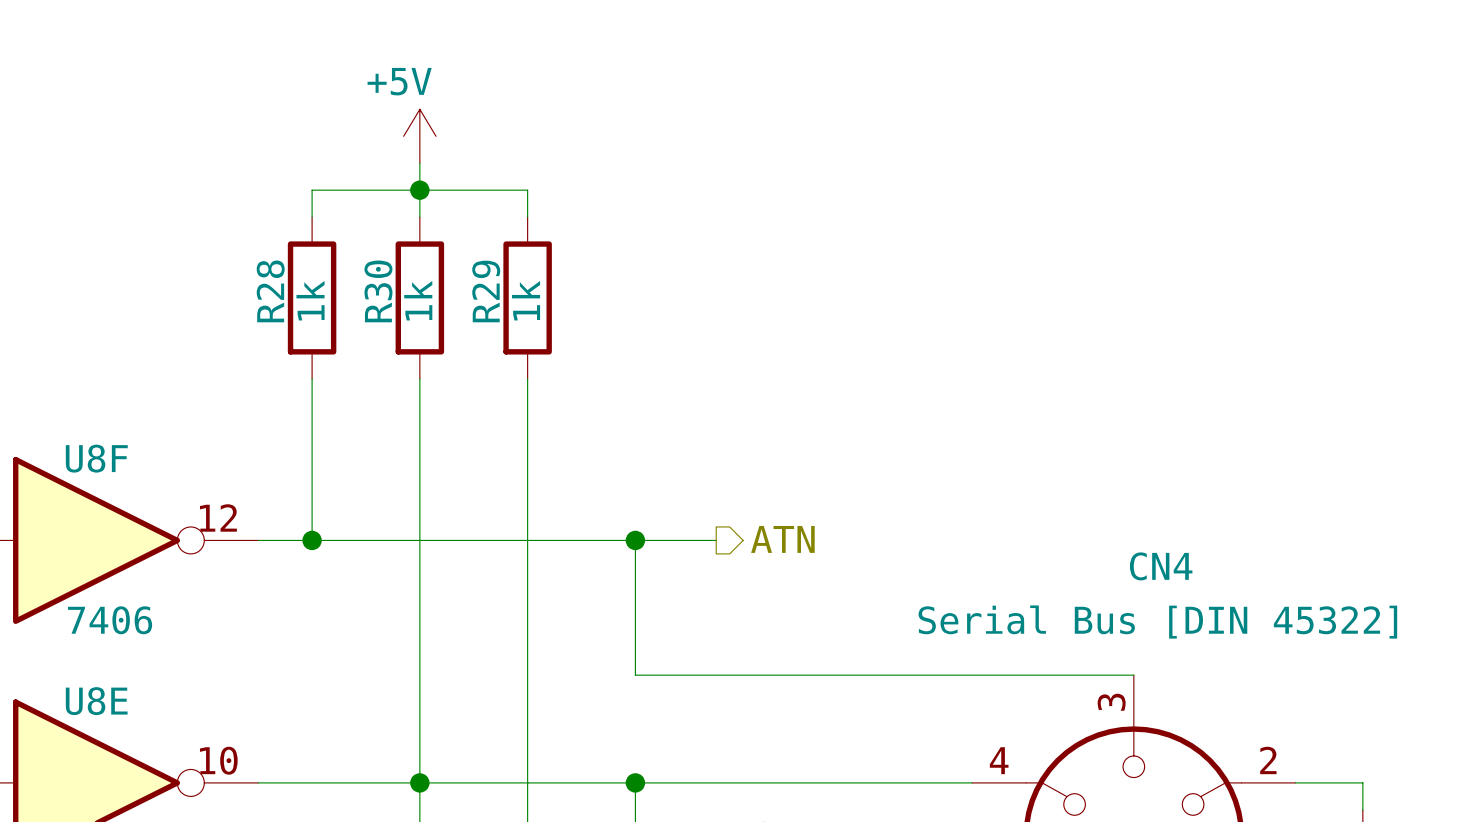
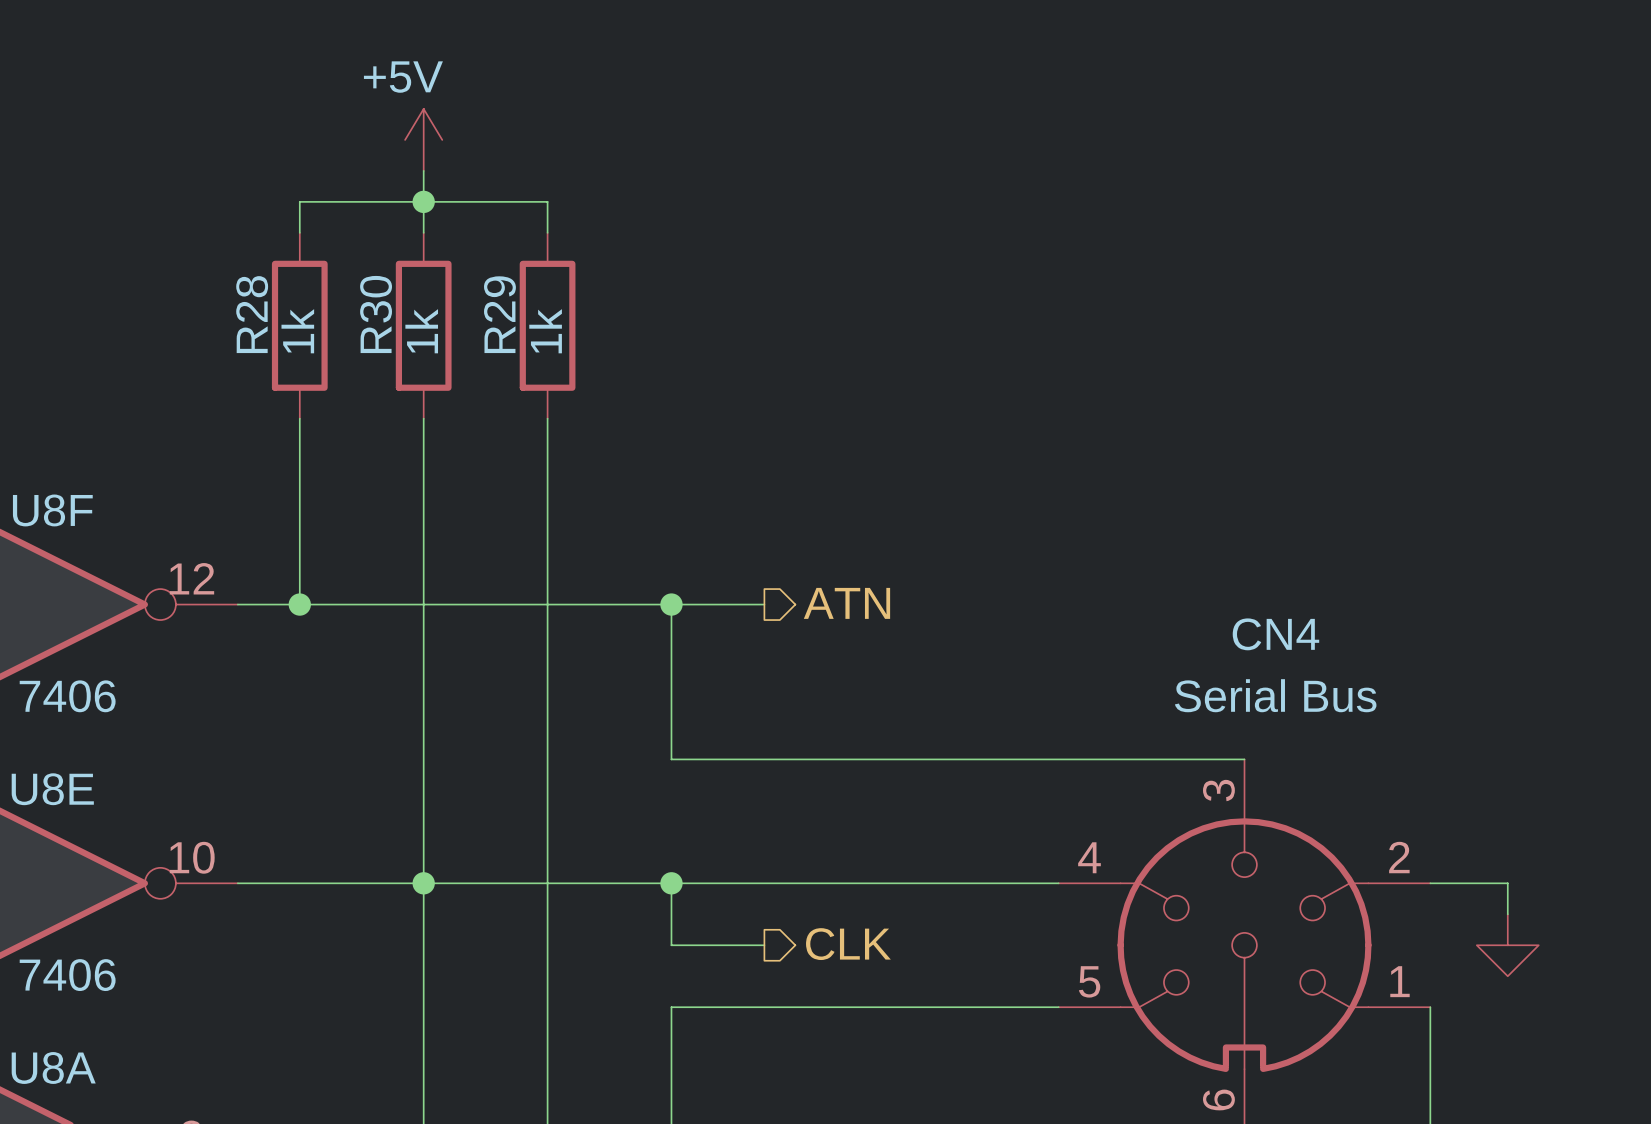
CN4 value: Serial Bus [DIN 45322] (1157, 622) -> Serial Bus (1275, 695)

